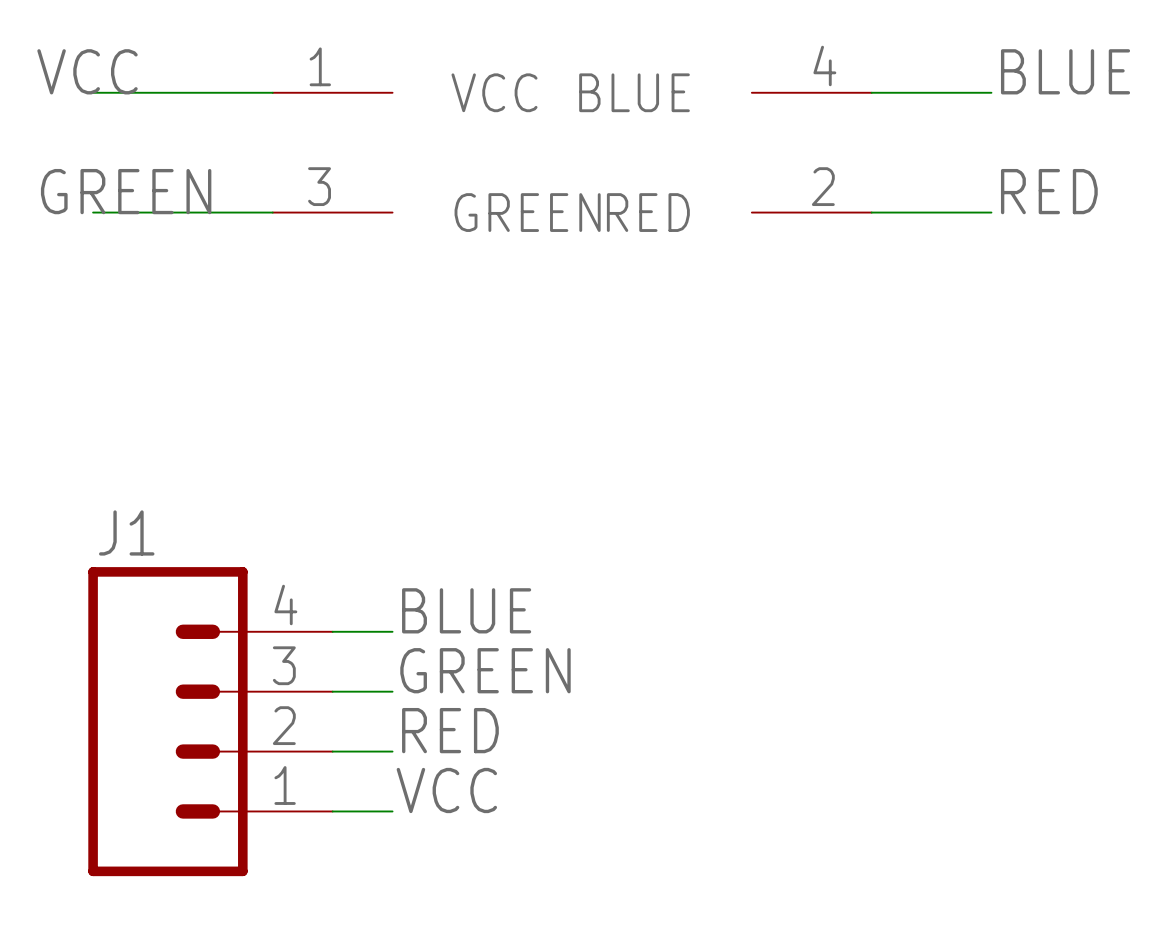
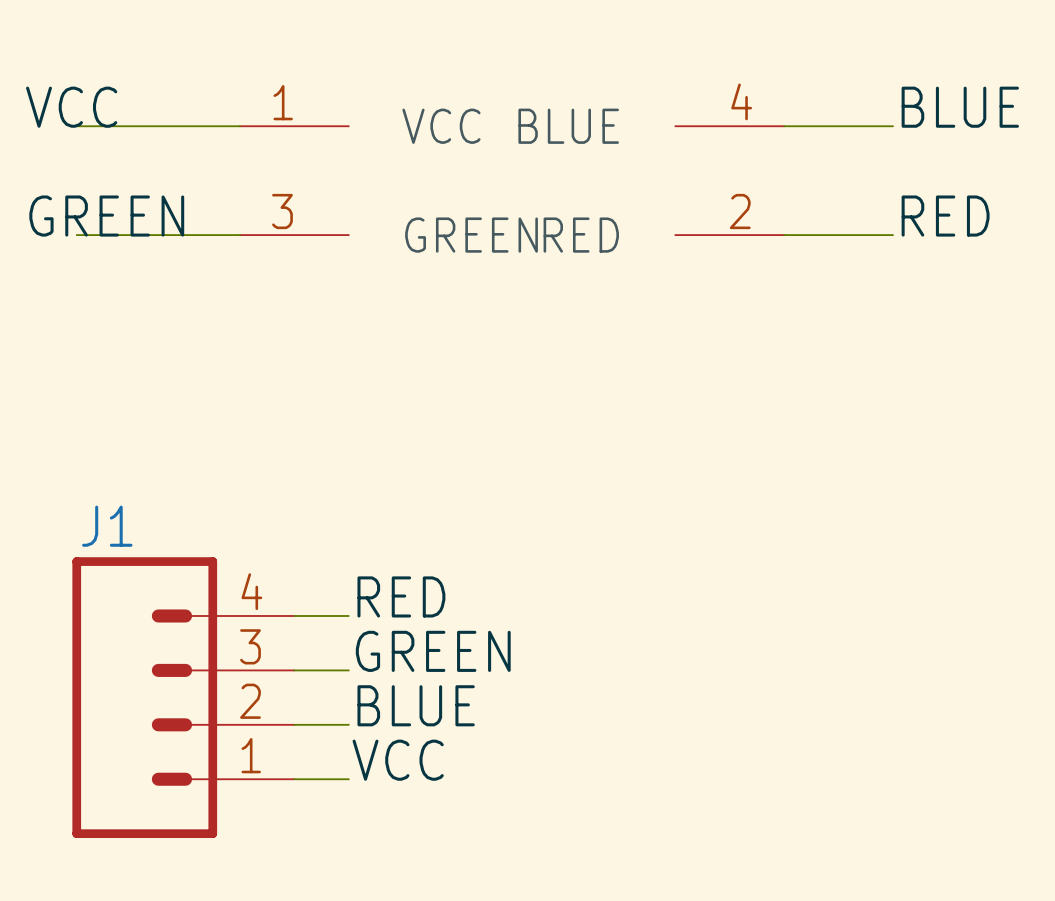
label: BLUE (466, 610) -> RED (401, 596)
label: RED (450, 730) -> BLUE (416, 705)

